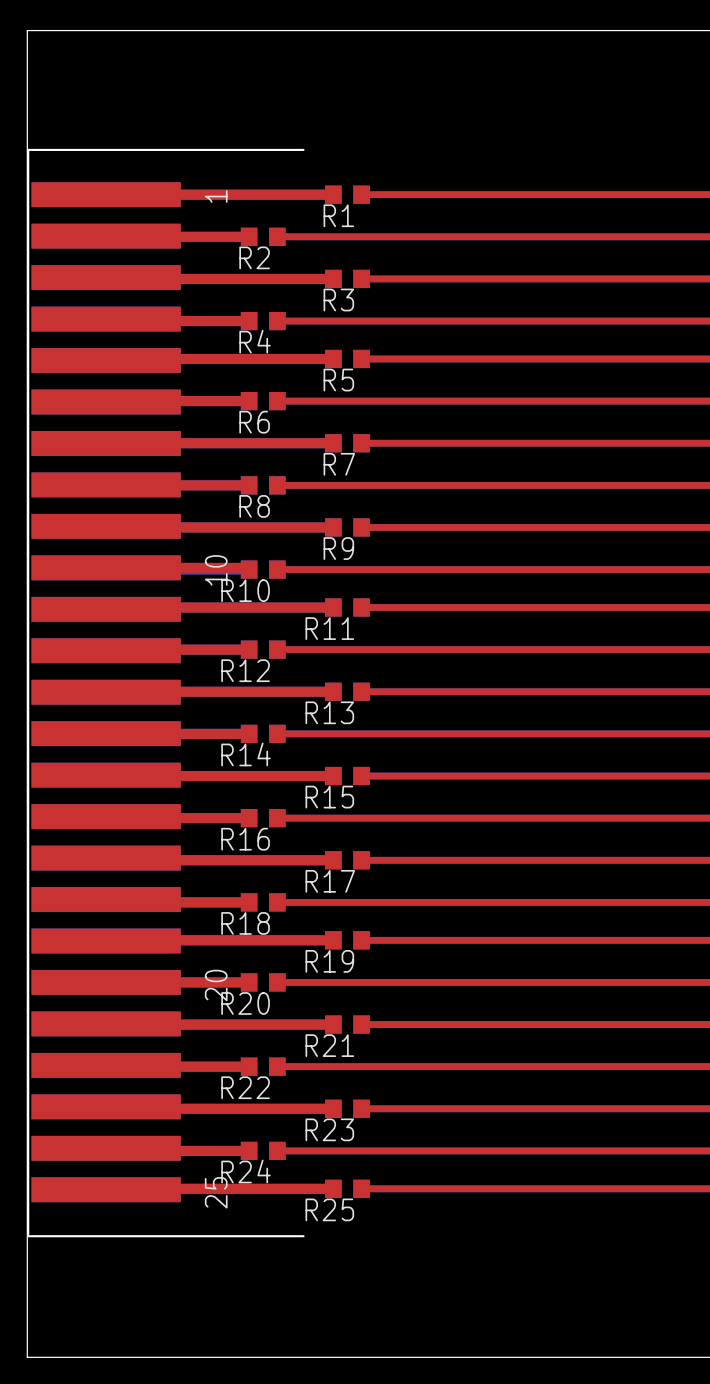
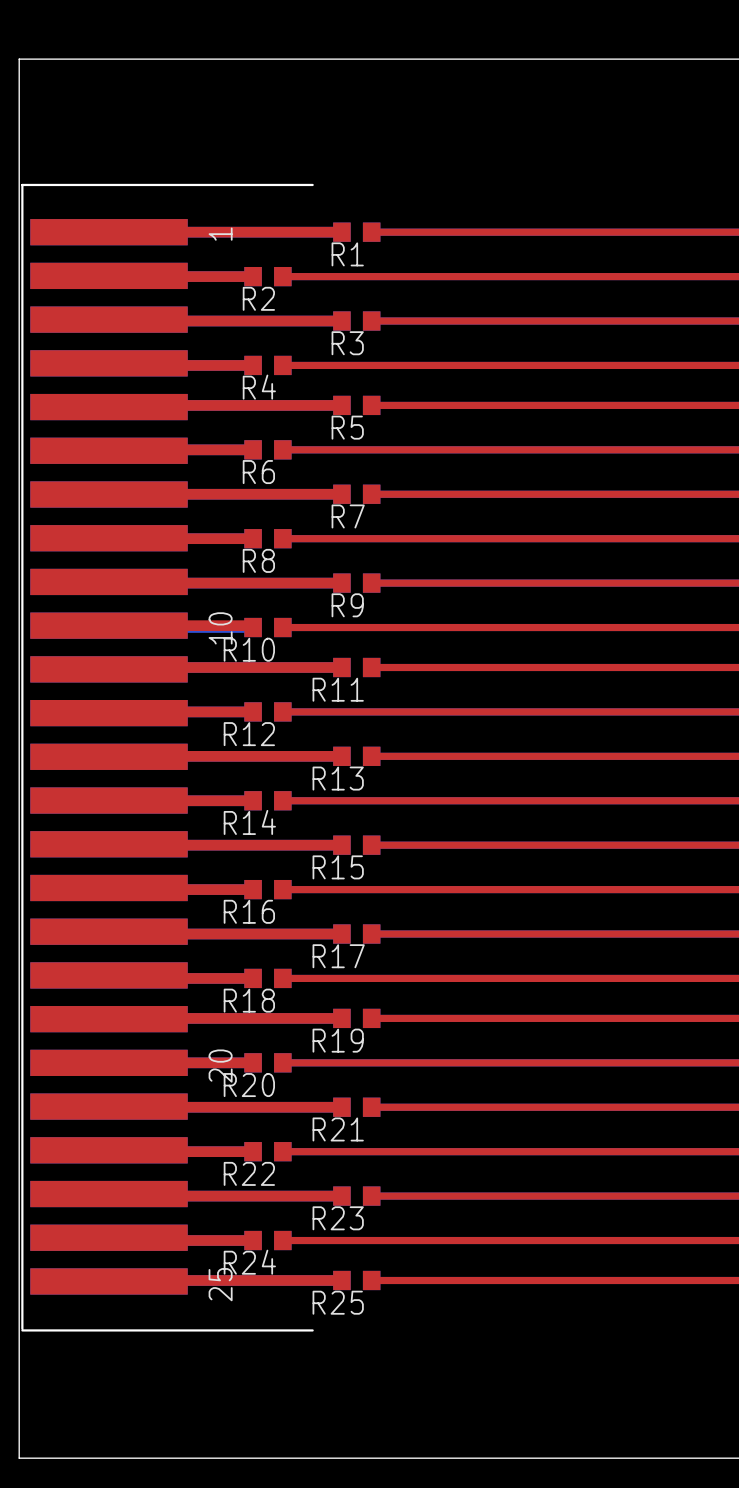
part footprint: [27, 148, 305, 1238] -> [21, 183, 314, 1332]

